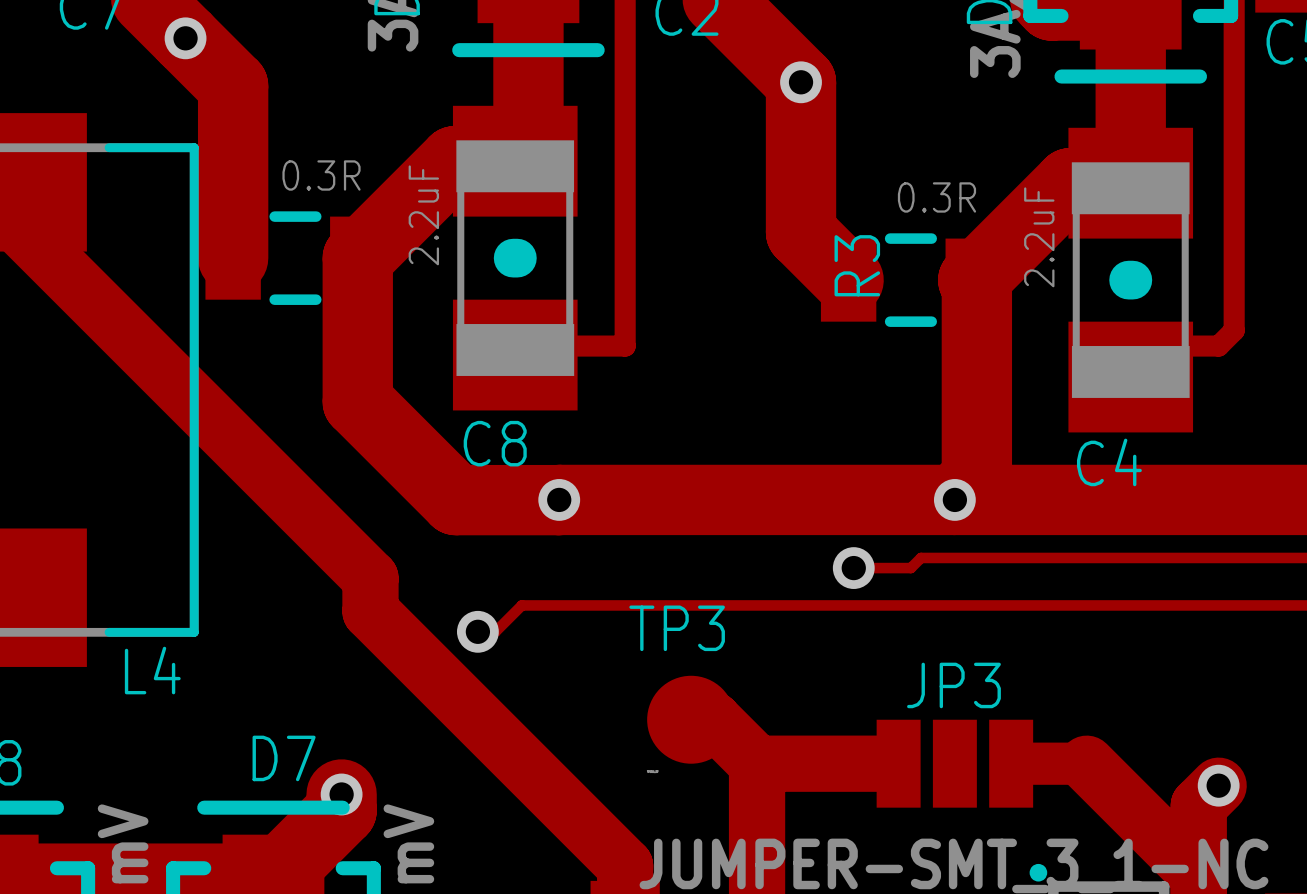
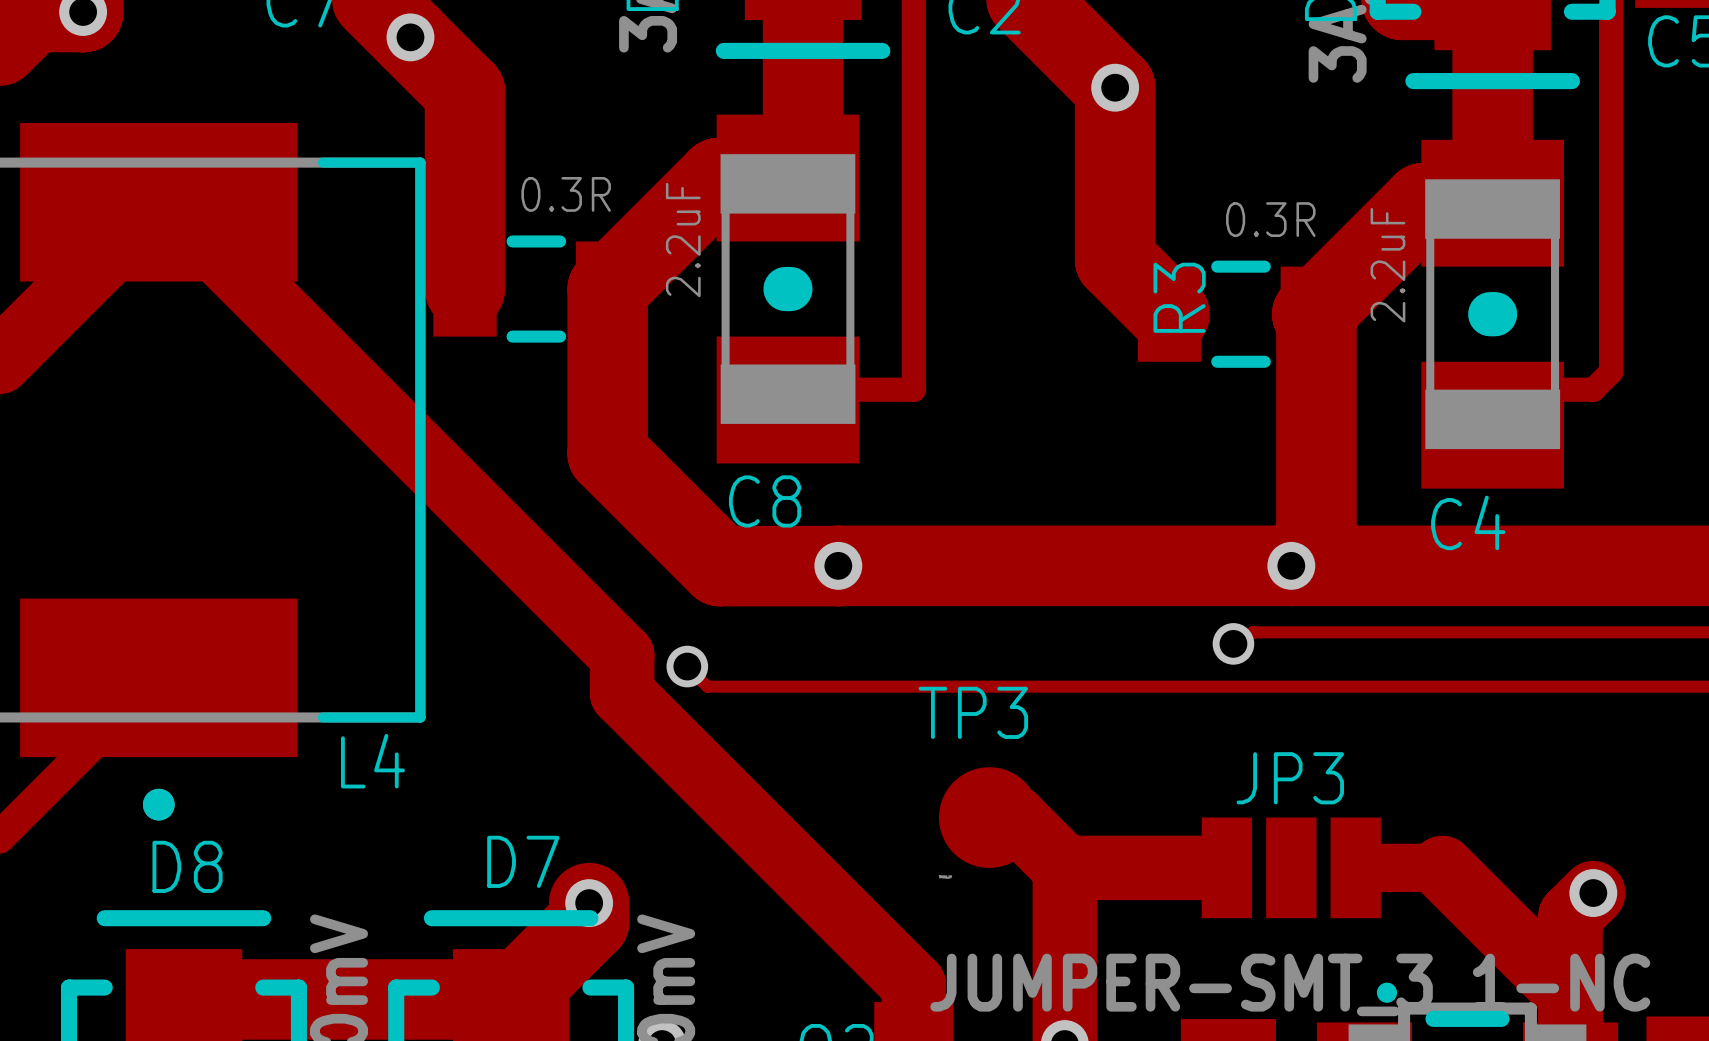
track: (853, 568) (904, 568) -> none
via: (853, 568) -> none
via: none -> (1233, 643)
via: none -> (687, 666)
track: (521, 605) (495, 631) (477, 631) -> (795, 686) (707, 686) (687, 666)
via: (477, 631) -> none

